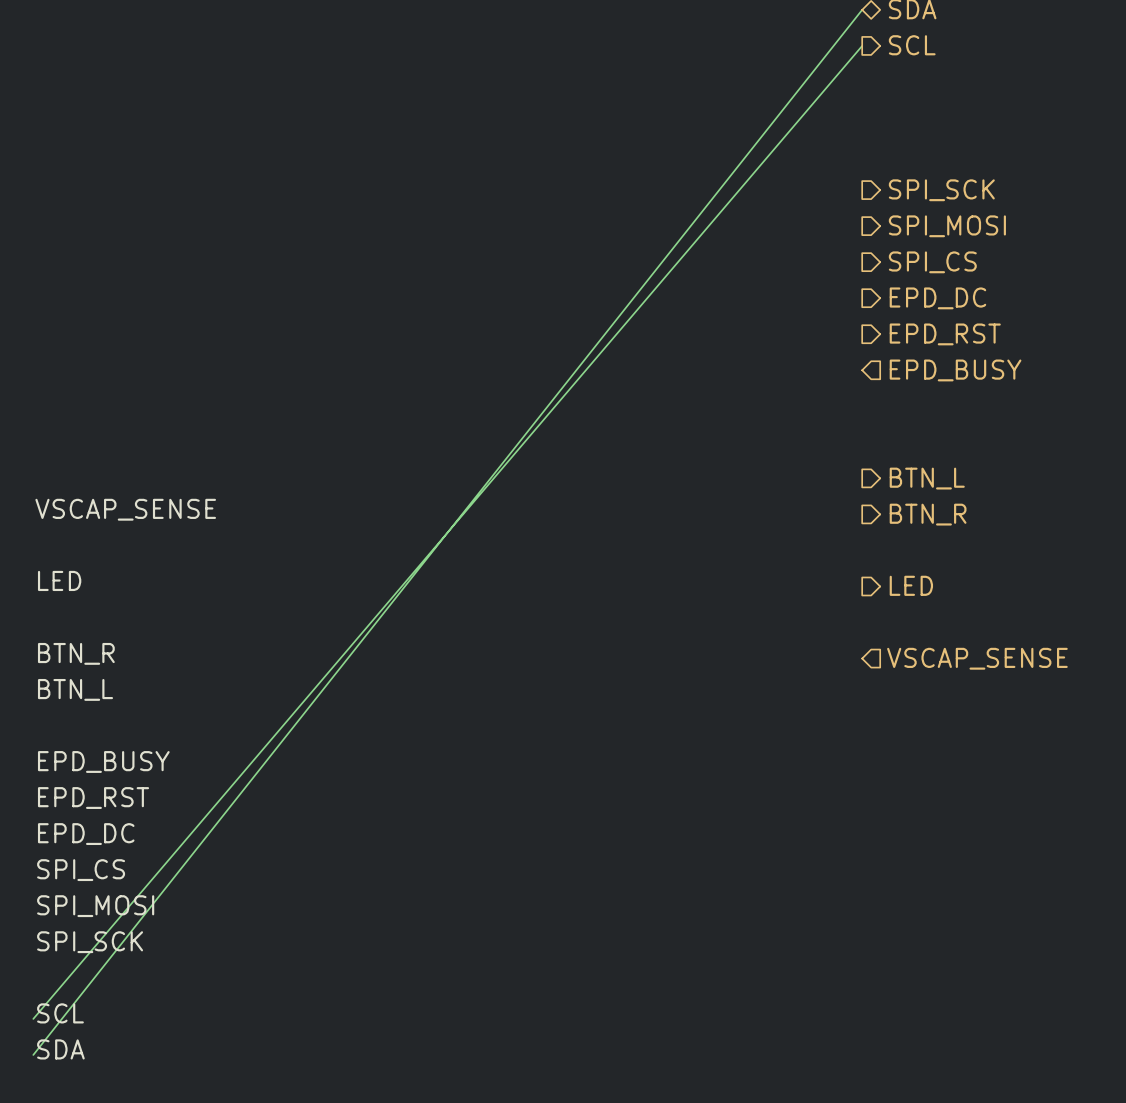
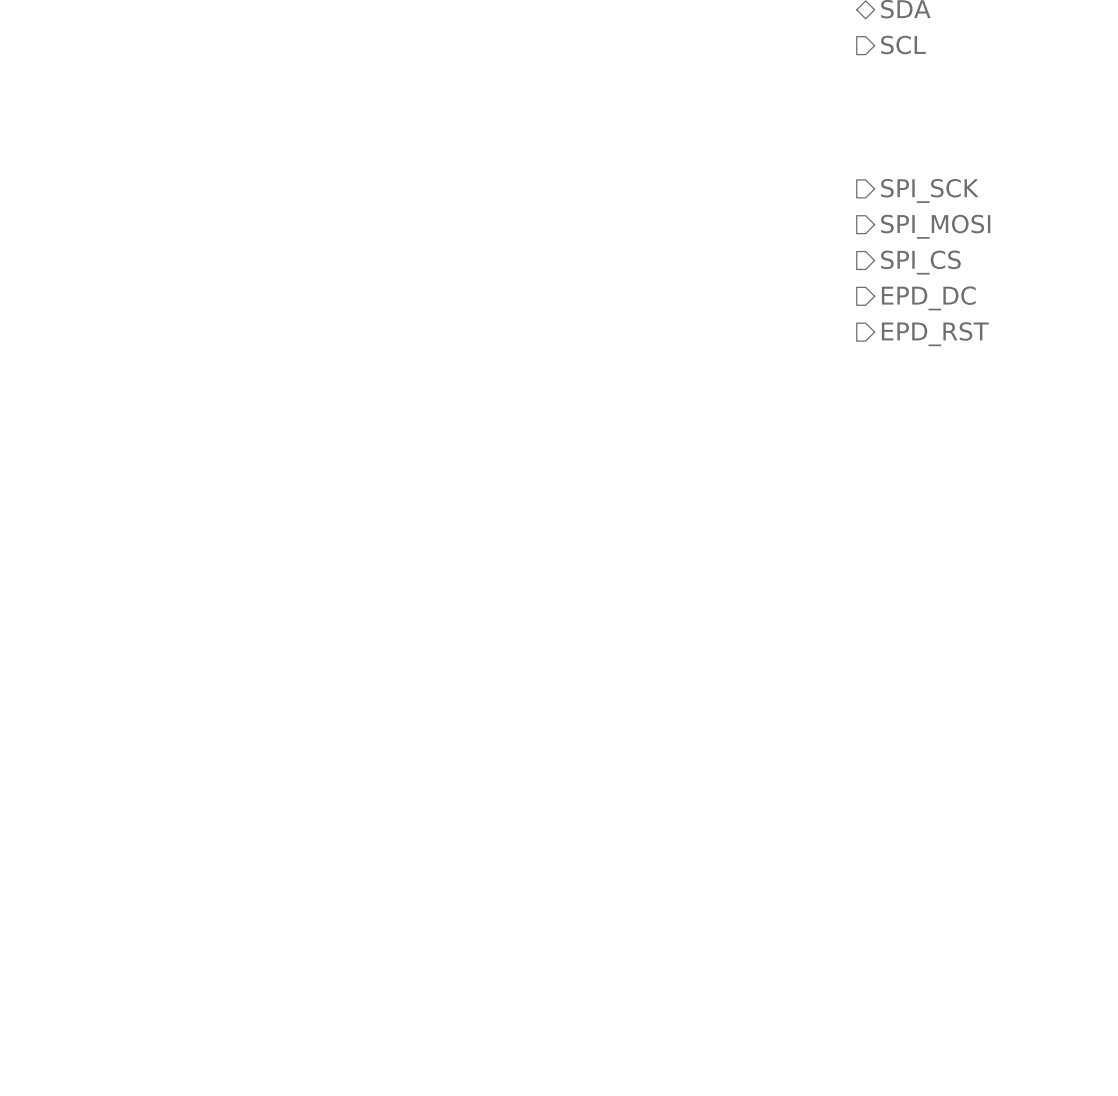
wire: (862, 9) (33, 1054) -> none
wire: (862, 45) (33, 1018) -> none
hierarchical label: EPD_BUSY (955, 370) -> none
hierarchical label: BTN_L (927, 478) -> none
label: VSCAP_SENSE (125, 509) -> none
hierarchical label: BTN_R (928, 514) -> none
label: LED (59, 580) -> none
hierarchical label: LED (911, 585) -> none
label: BTN_R (76, 653) -> none
hierarchical label: VSCAP_SENSE (977, 658) -> none
label: BTN_L (75, 689) -> none
label: EPD_BUSY (103, 761) -> none
label: EPD_RST (93, 798) -> none
label: EPD_DC (86, 834) -> none
label: SPI_CS (81, 870) -> none
label: SPI_MOSI (95, 906) -> none
label: SPI_SCK (90, 942) -> none
label: SCL (60, 1013) -> none
label: SDA (60, 1049) -> none

